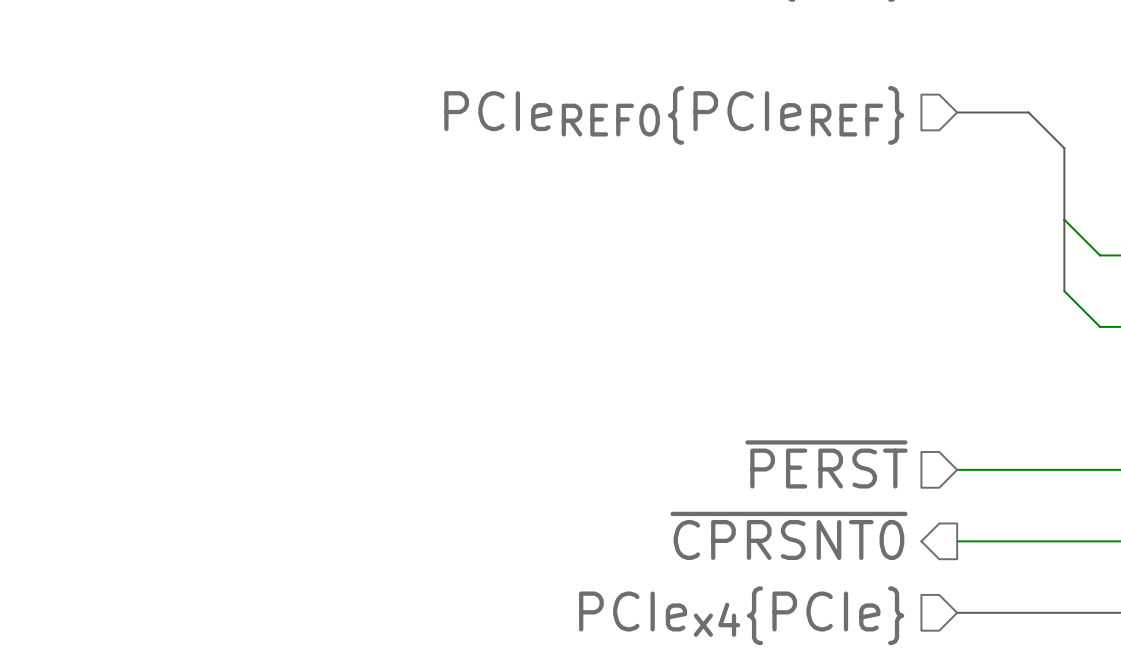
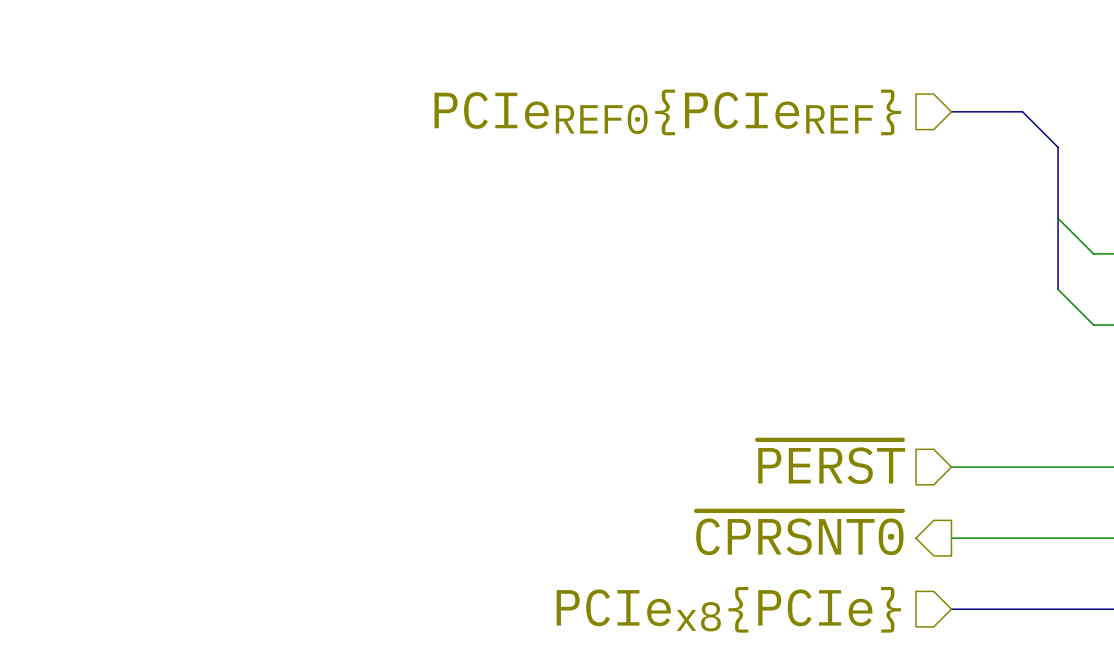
hierarchical label: PCIex4{PCIe} (741, 615) -> PCIex8{PCIe} (728, 609)

